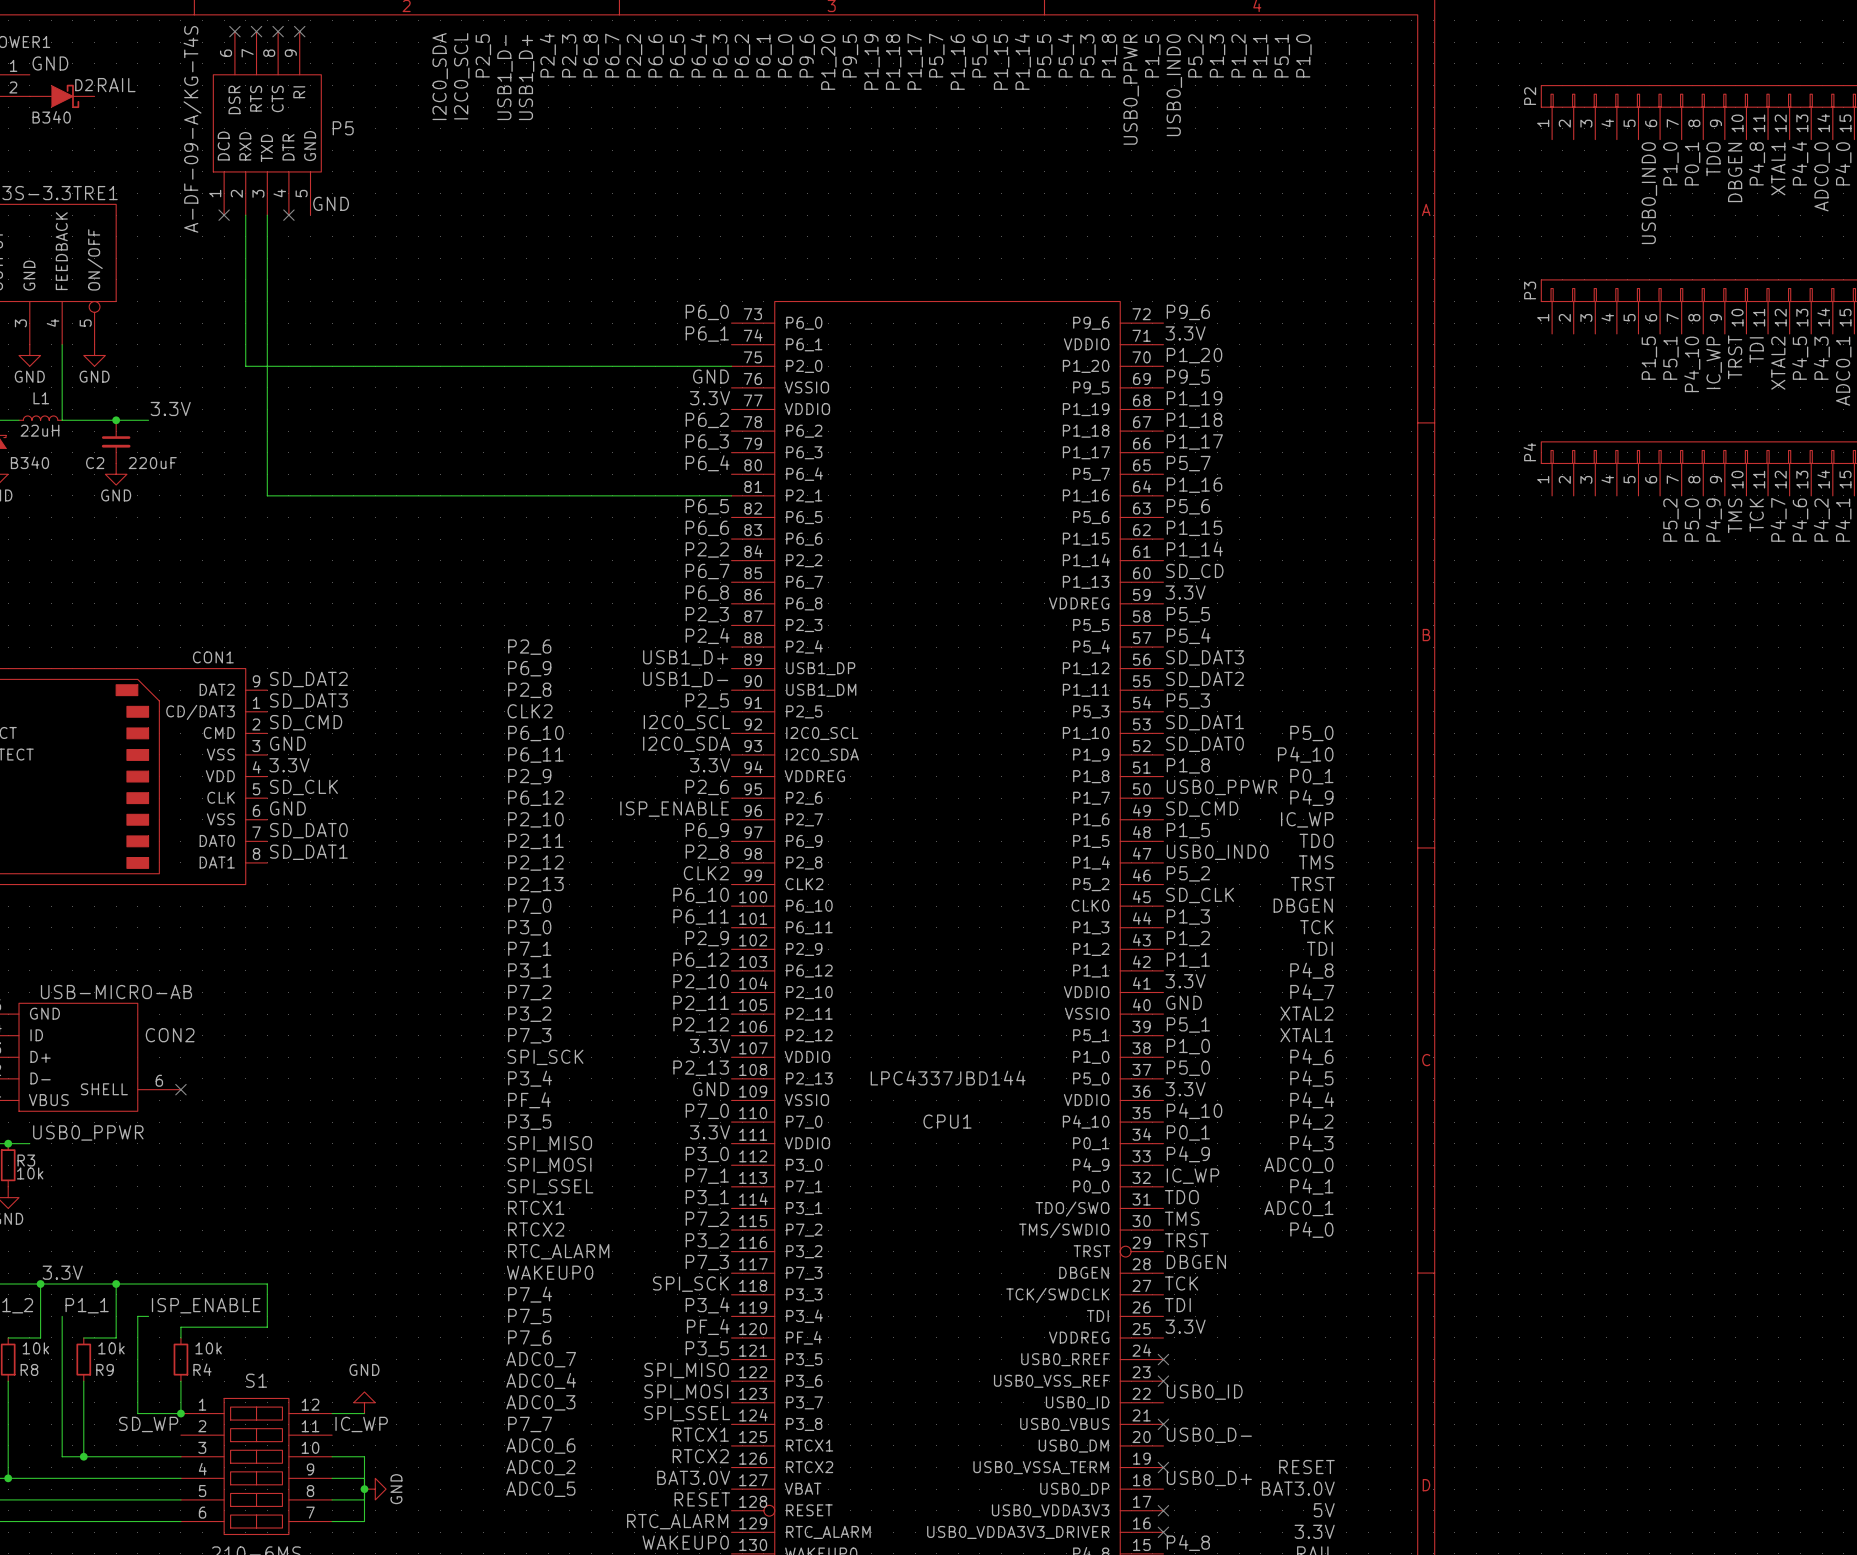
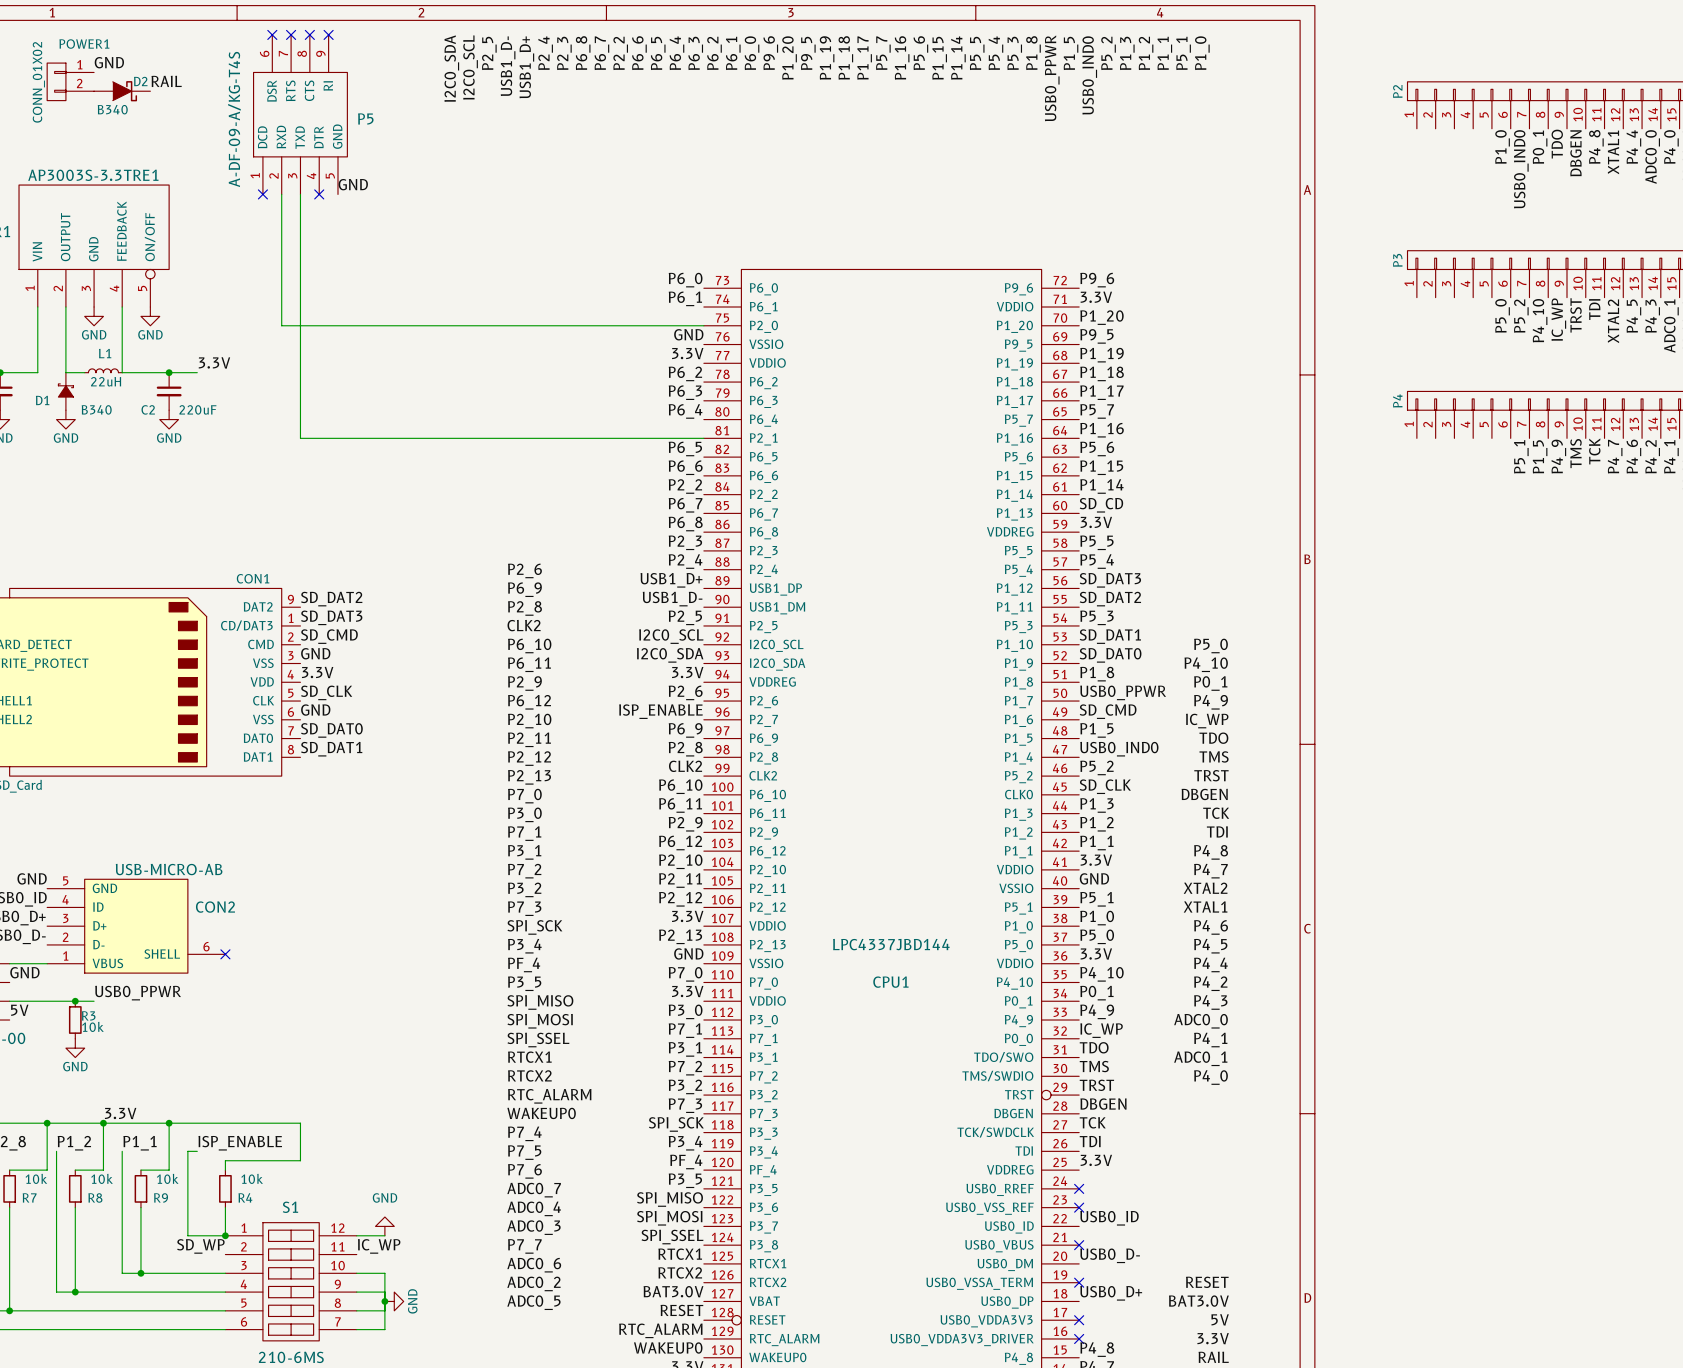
label: P1_0 (1670, 163) -> USB0_IND0 (1521, 169)
label: USB0_IND0 (1649, 193) -> P1_0 (1502, 147)
label: P1_5 (1649, 358) -> P5_0 (1502, 315)
label: P5_1 (1670, 358) -> P5_2 (1521, 316)
label: P5_2 (1670, 520) -> P5_1 (1521, 456)
label: P5_0 (1692, 520) -> P1_5 (1540, 456)

